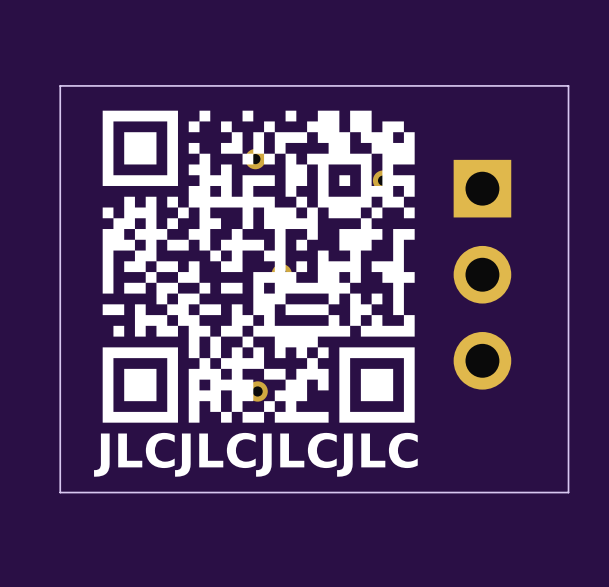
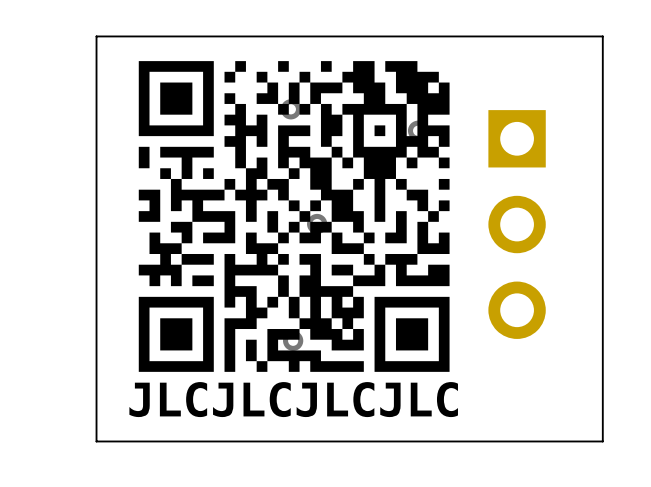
drawing shape: [102, 110, 415, 423] -> [138, 61, 450, 372]

